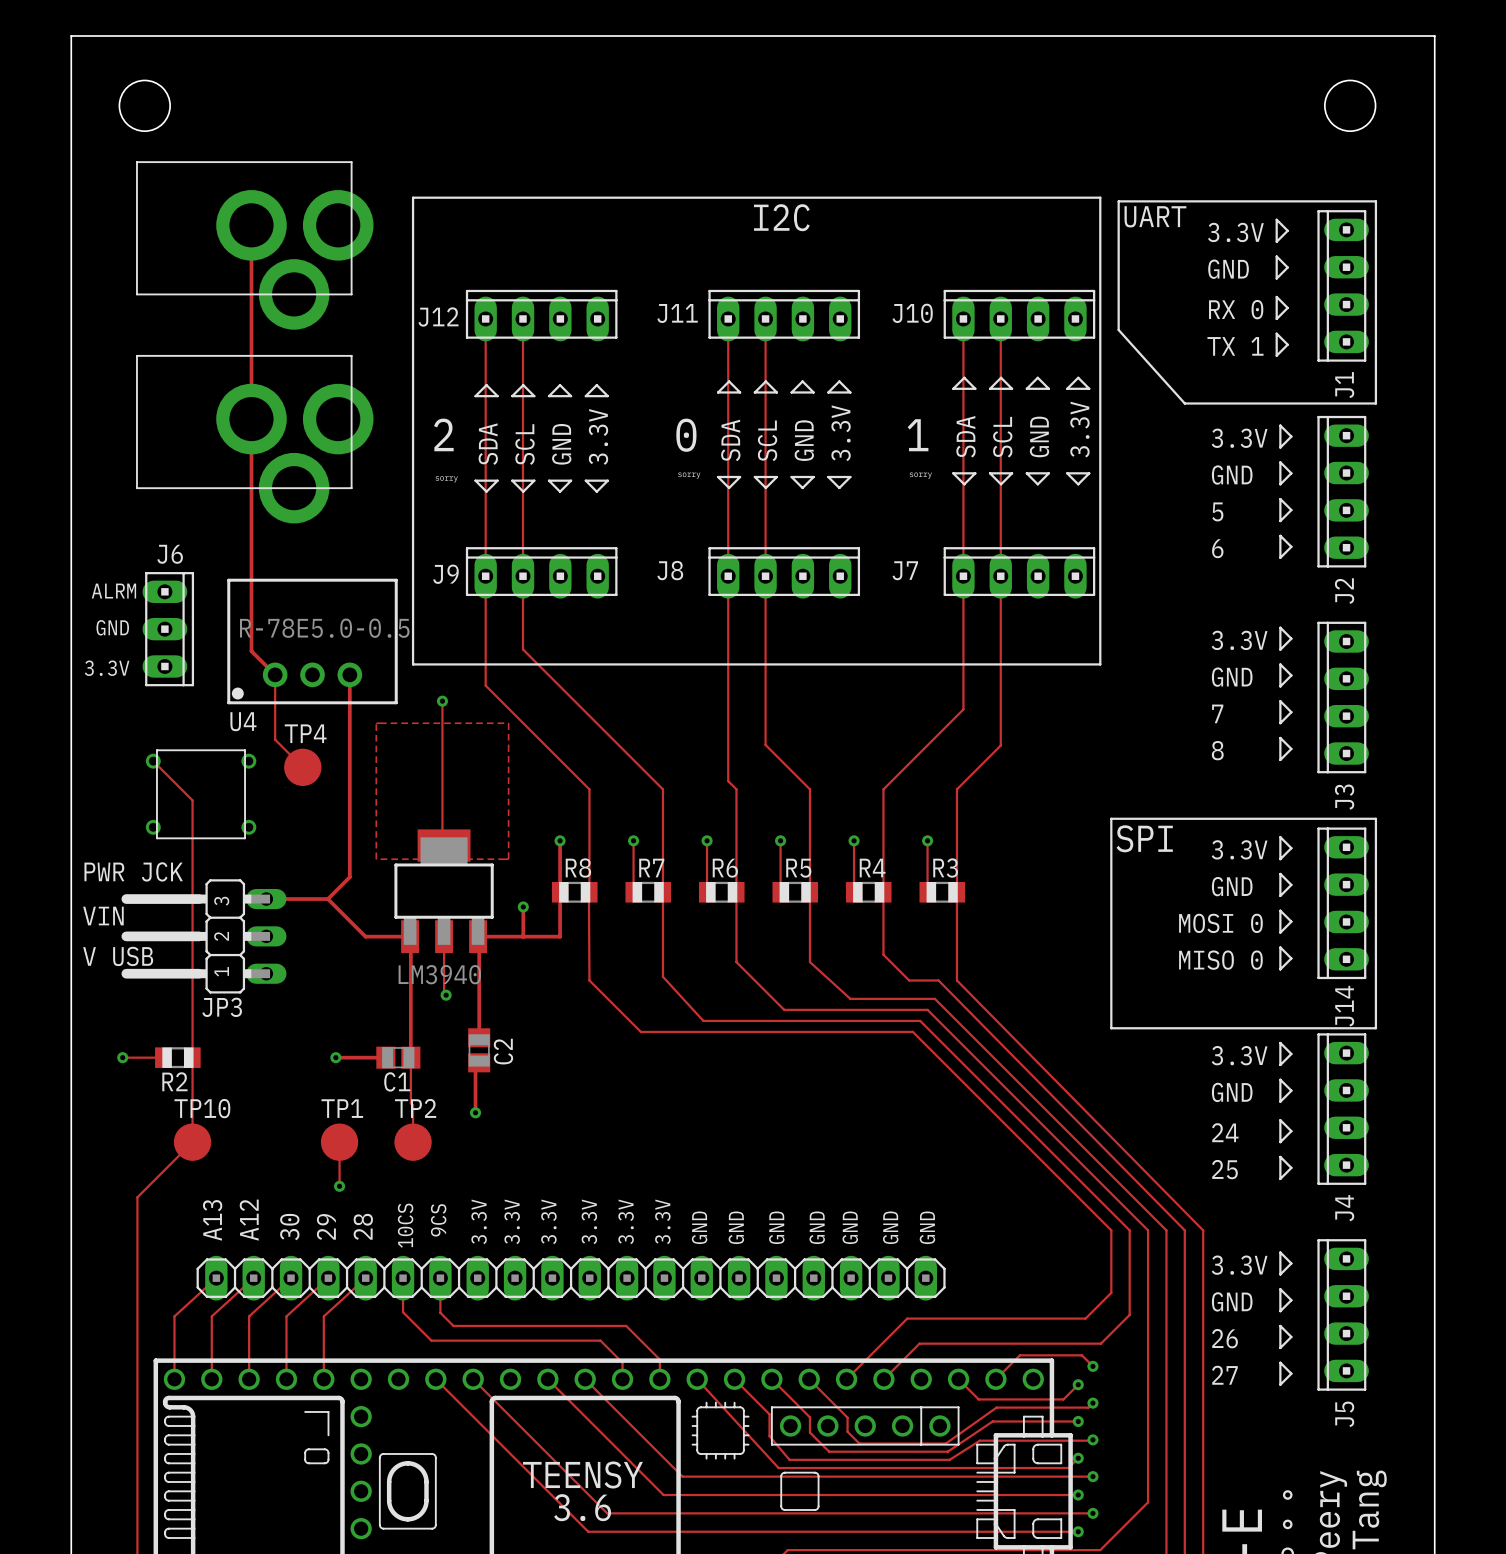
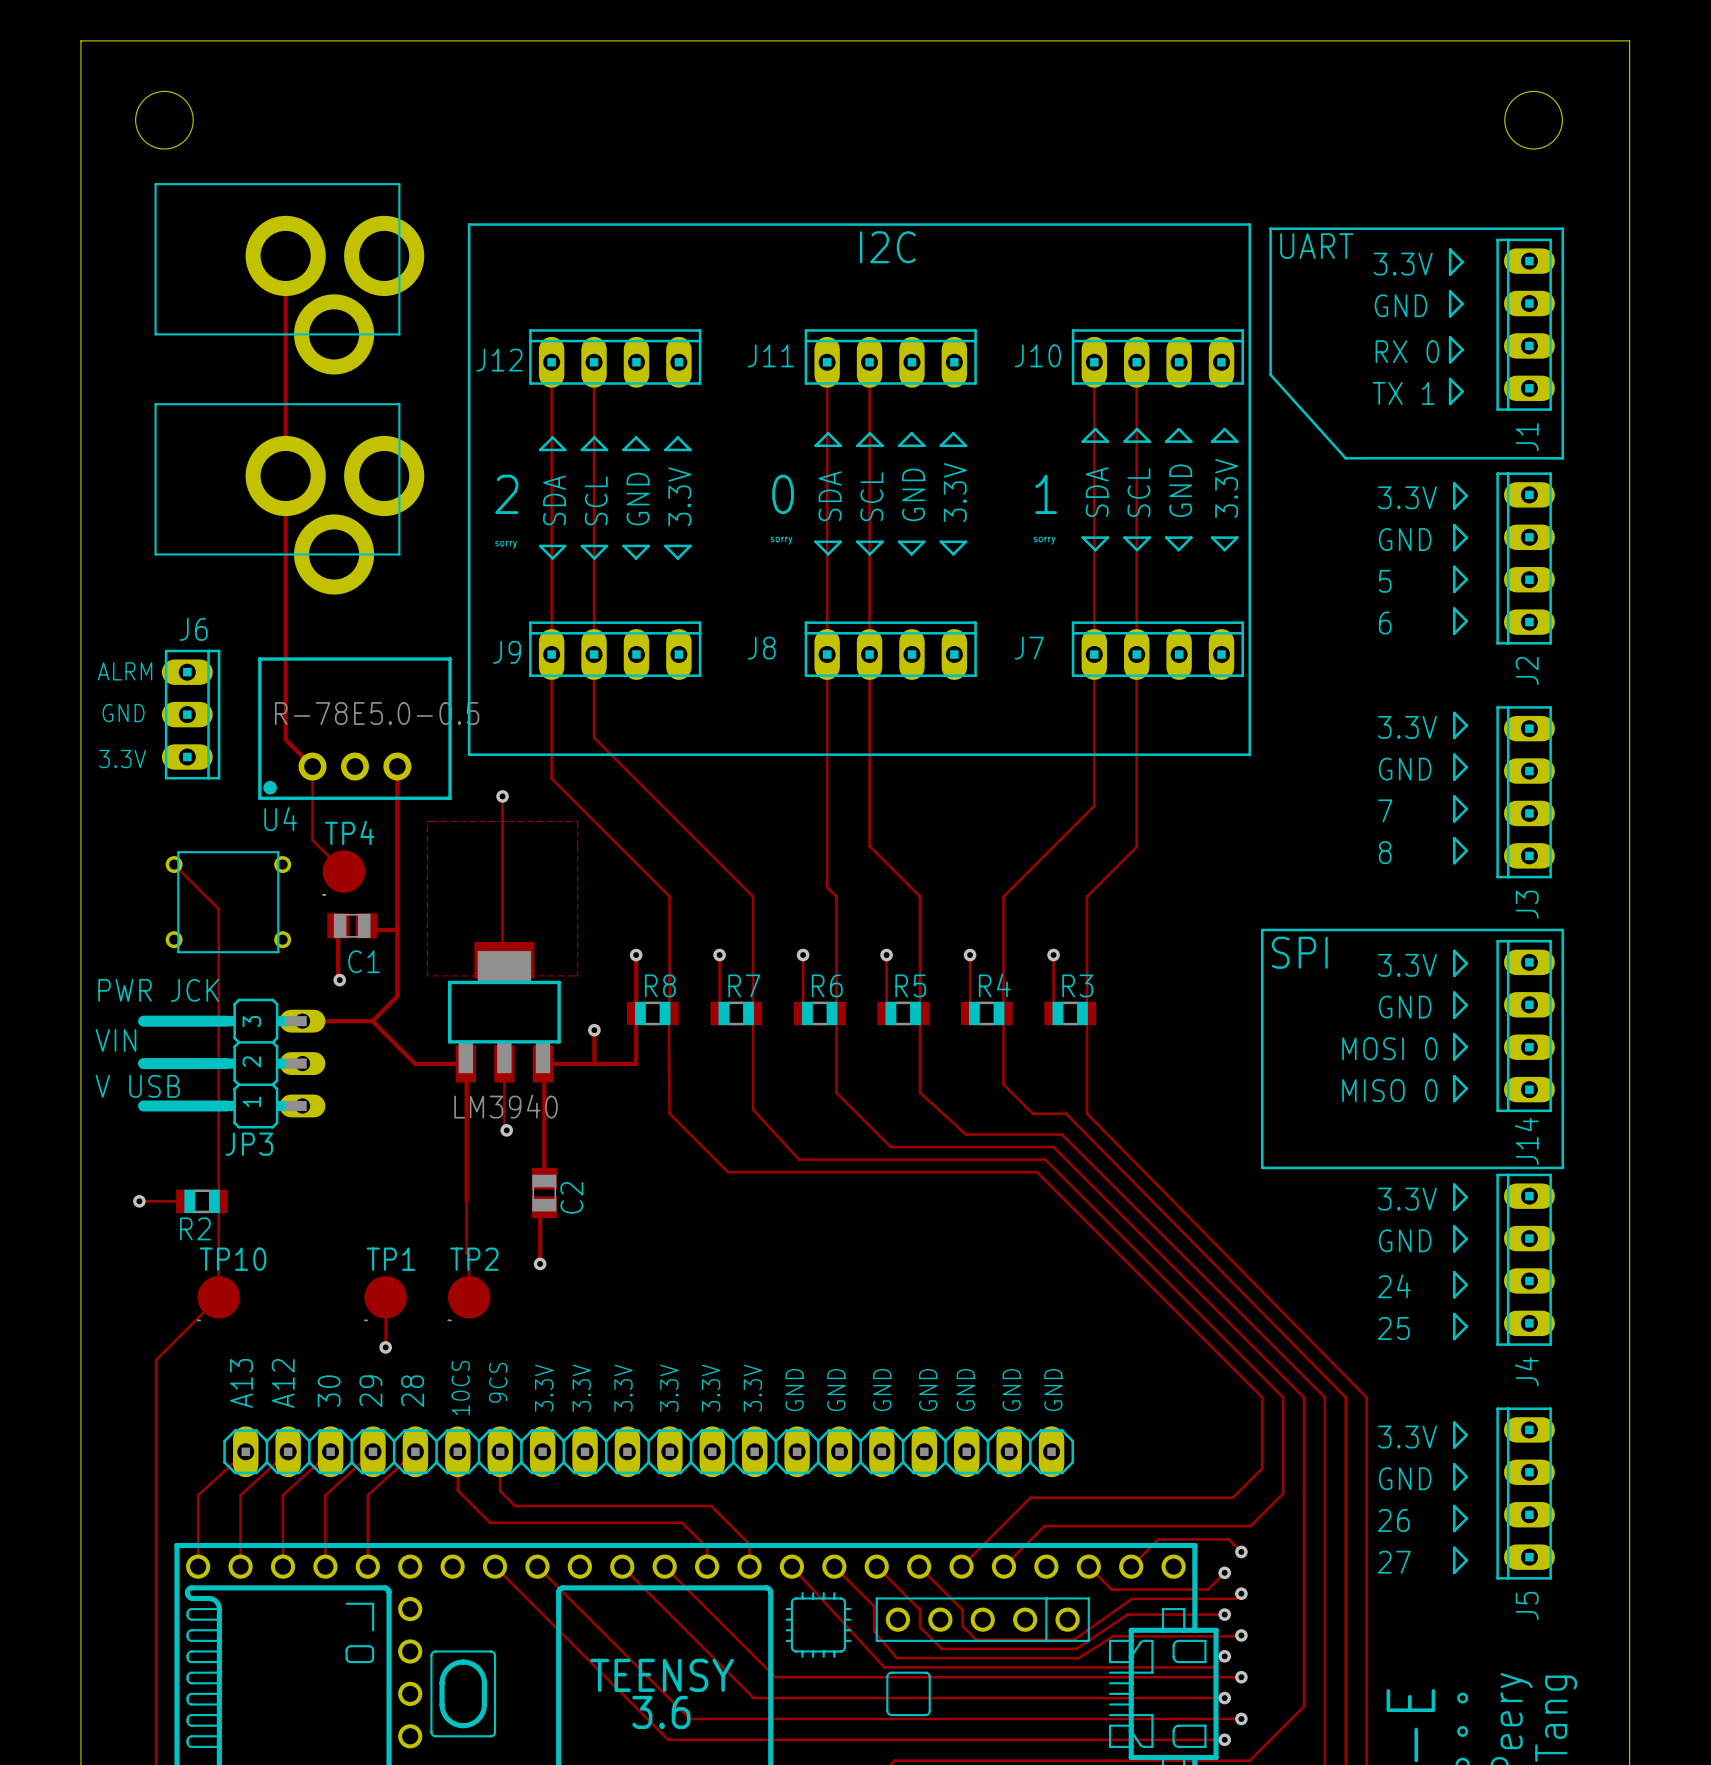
track: none -> (338, 925) (338, 978) (339, 980)
track: none -> (366, 925) (370, 930) (397, 930)
via: none -> (339, 980)
track: (335, 1057) (387, 1059) -> none
via: (335, 1057) -> none
C1 position: (398, 1057) -> (352, 925)
C1 name position: C1 (397, 1081) -> C1 (364, 961)

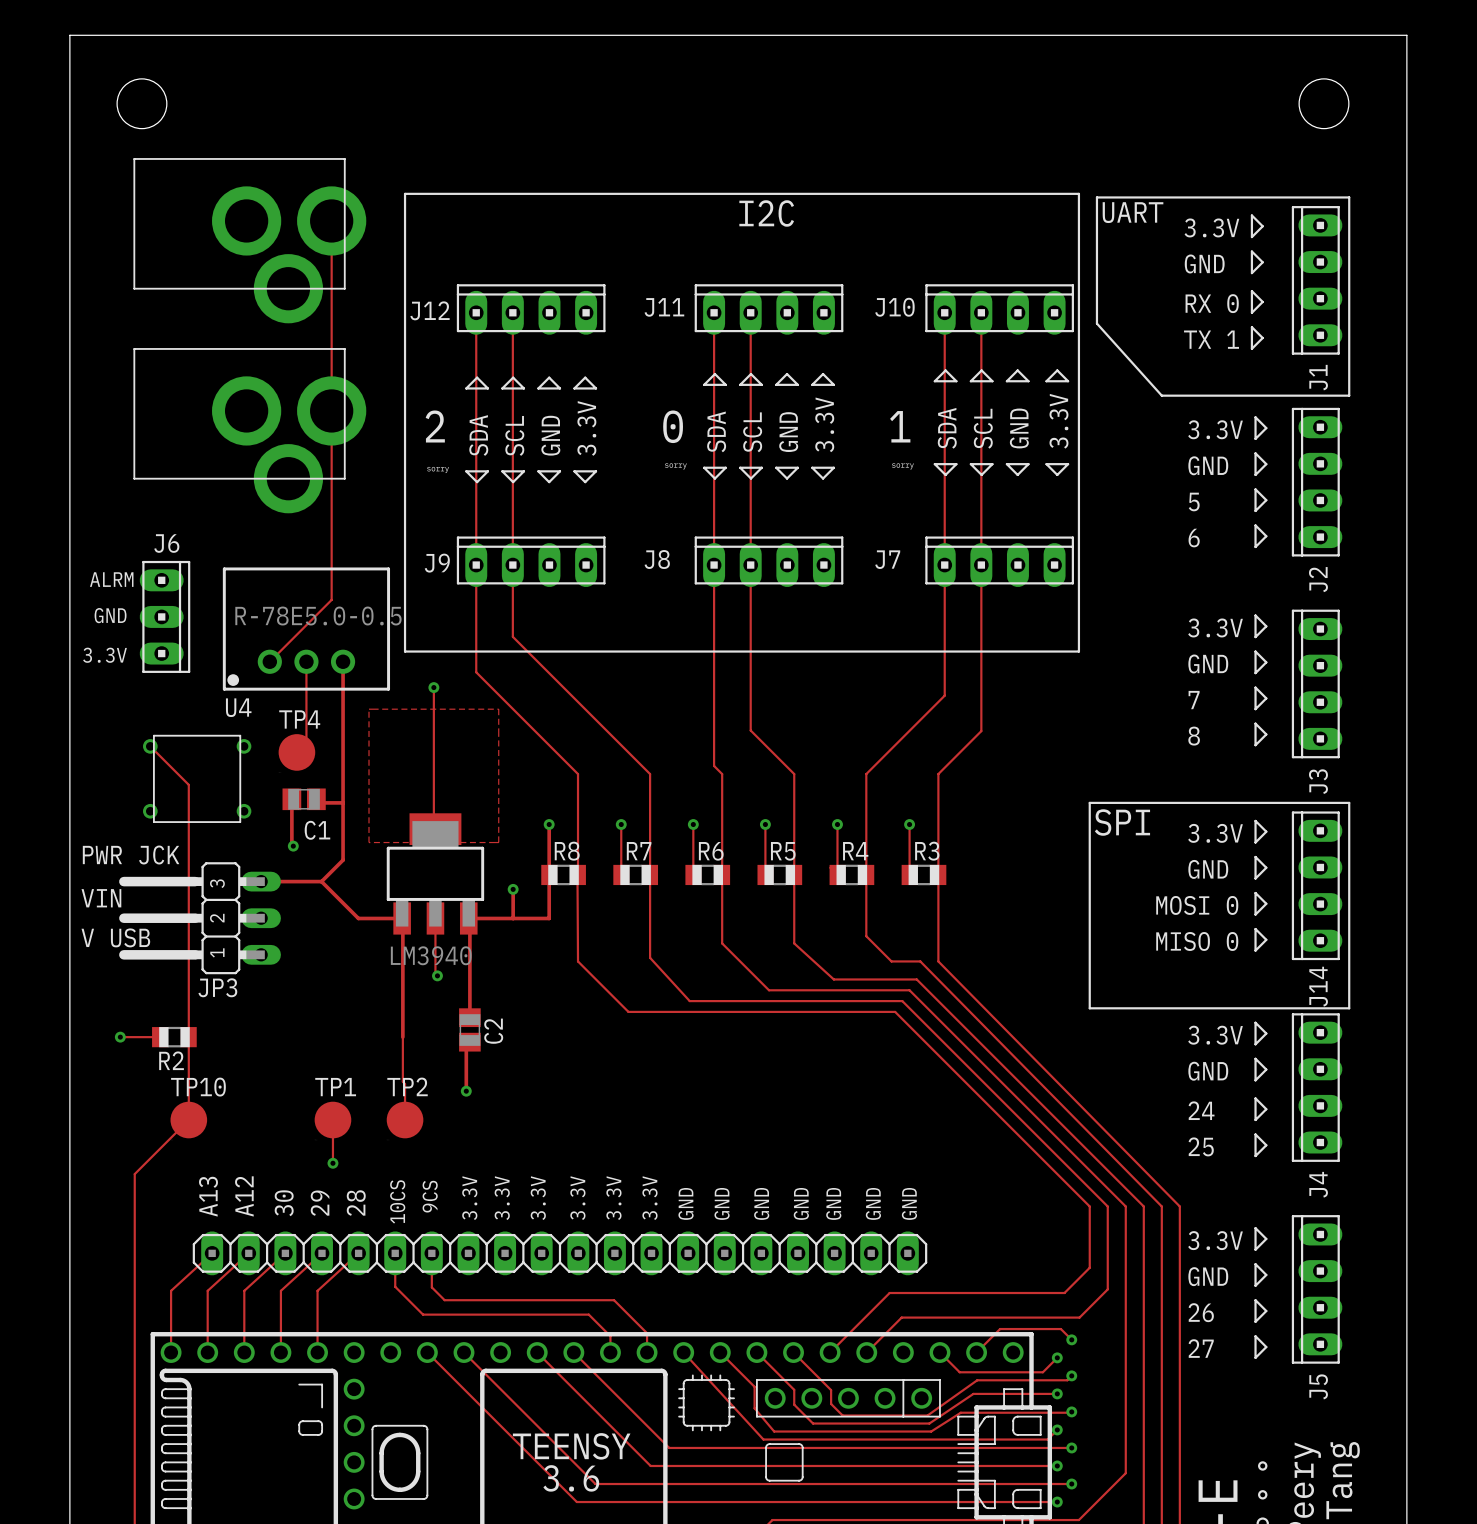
track: (285, 255) (285, 739) (312, 766) (312, 840) (343, 871) -> (306, 661) (306, 742) (296, 752)
track: none -> (331, 220) (331, 599) (269, 661)

